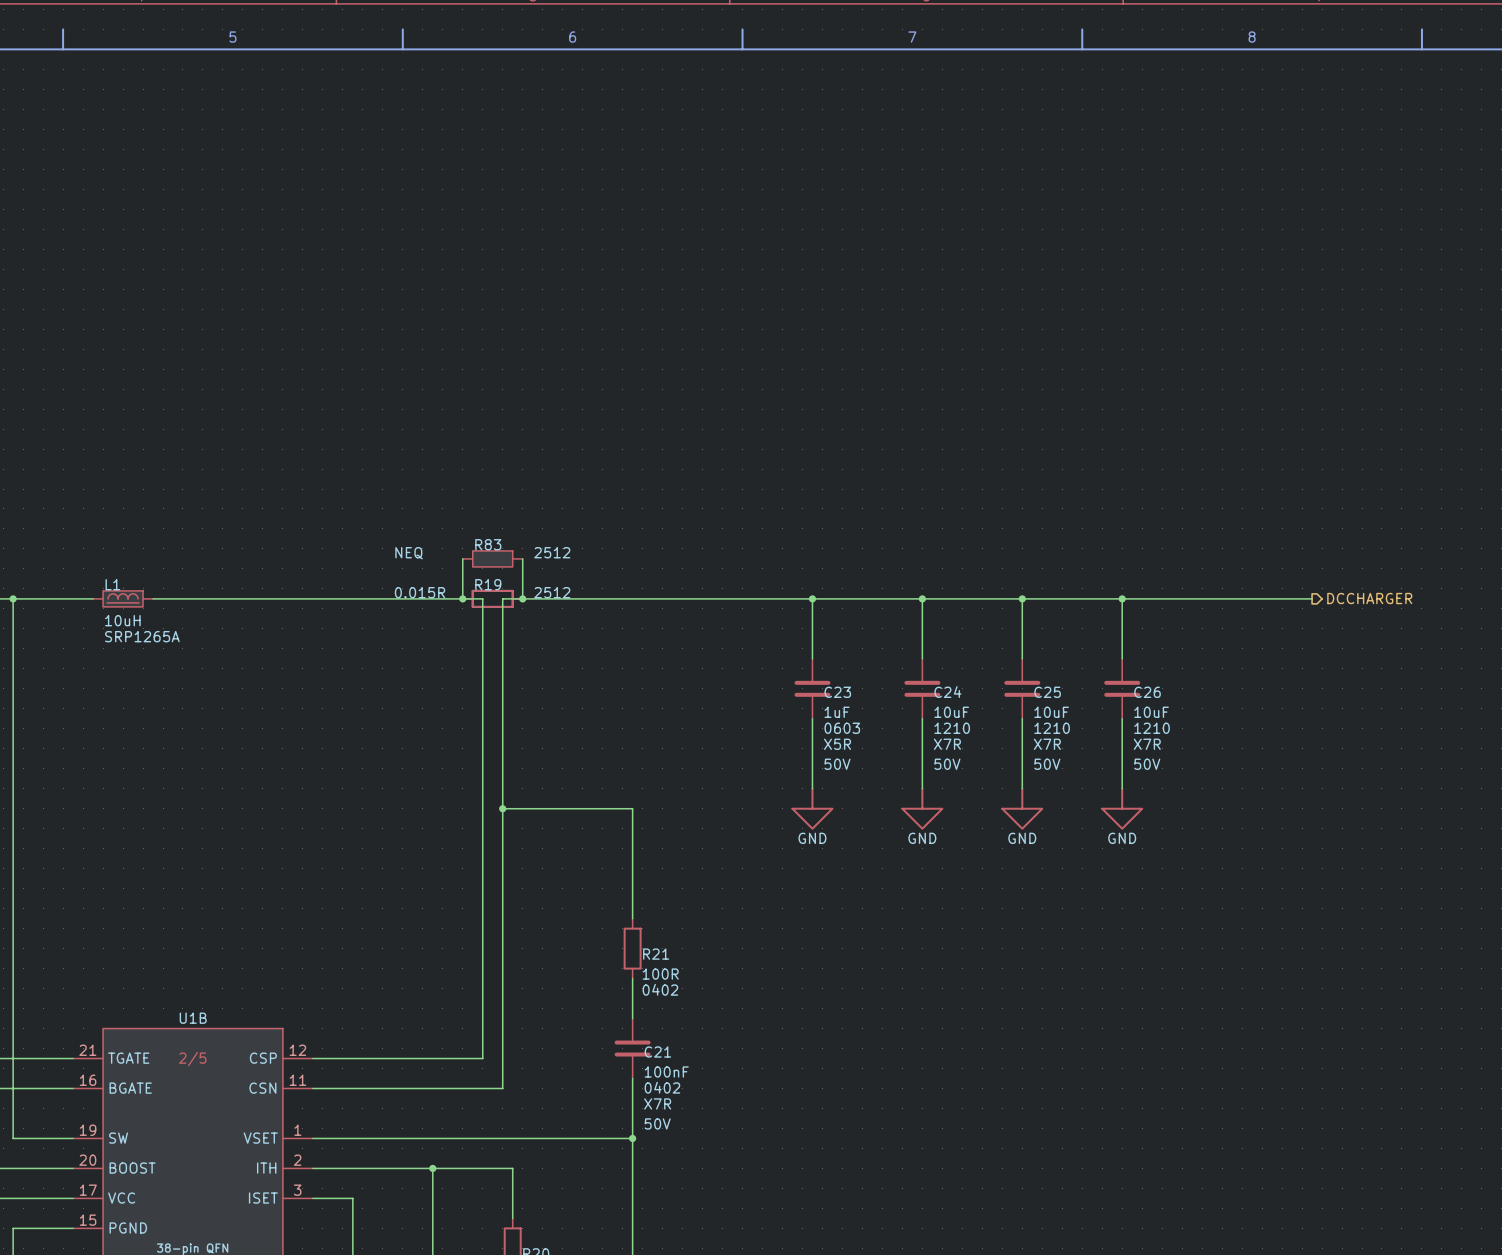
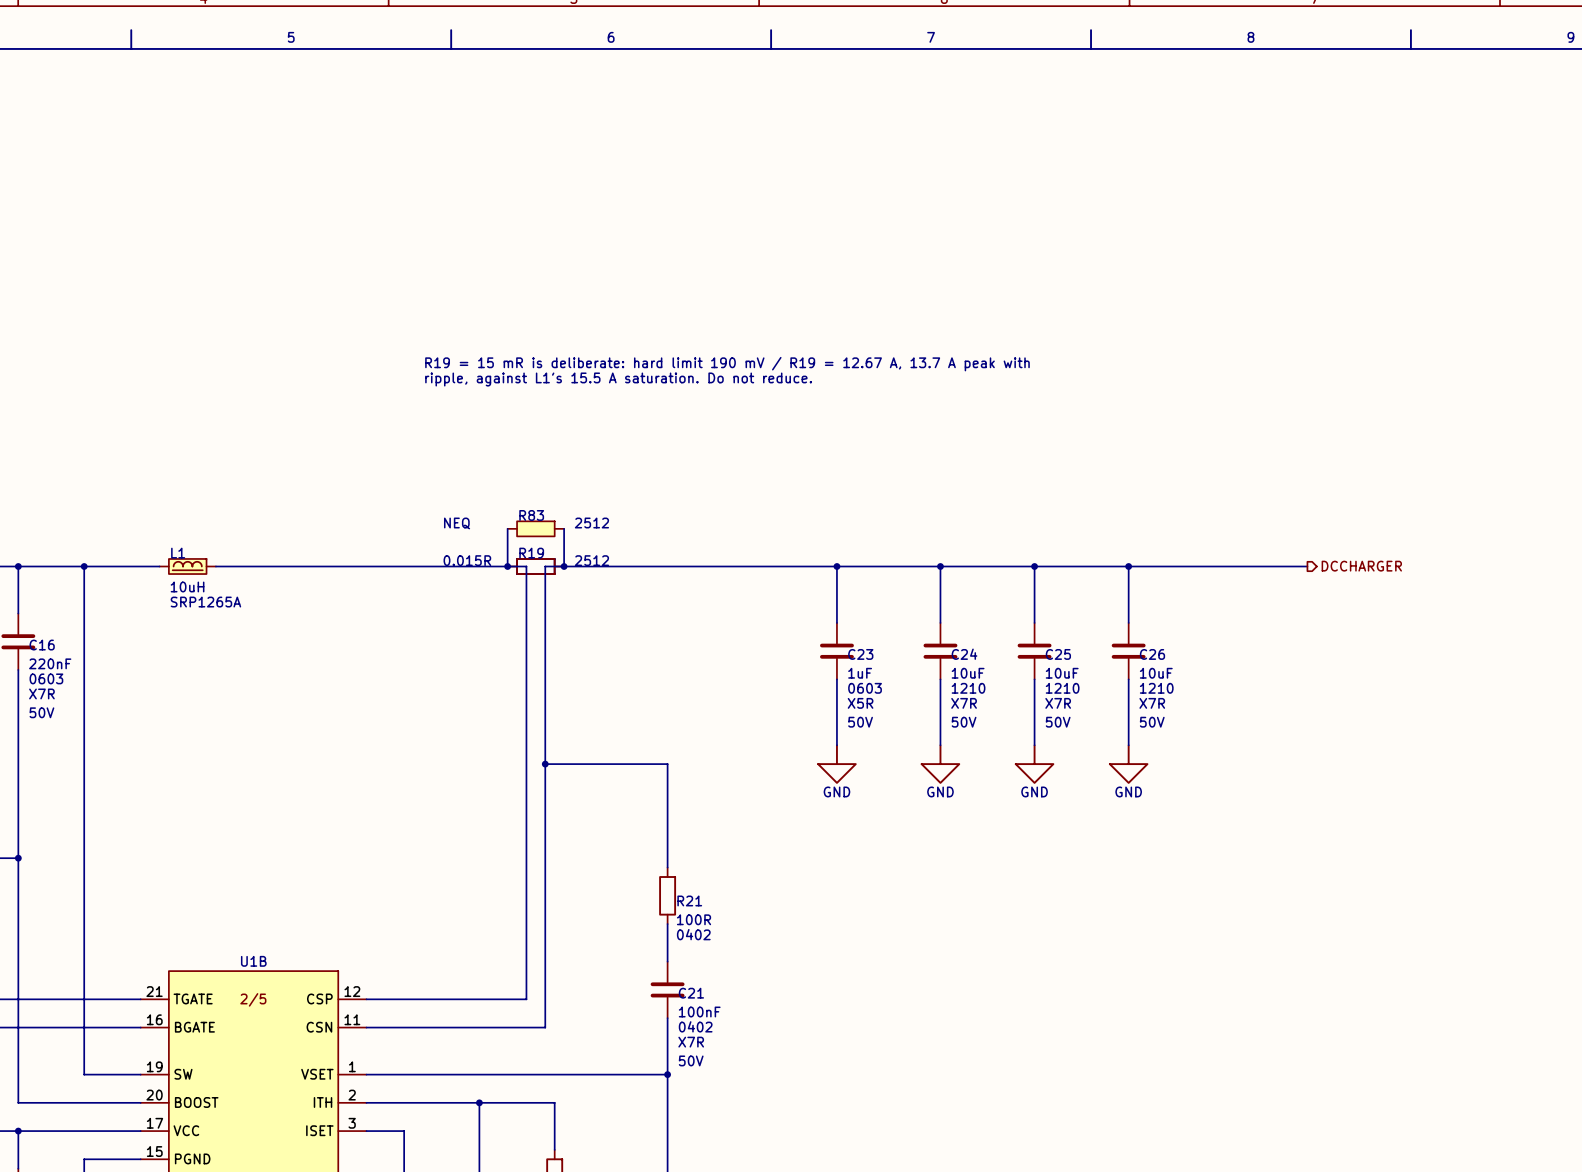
text: none -> R19 = 15 mR is deliberate: hard limit 190 mV / R19 = 12.67 A, 13.7 A peak with (727, 364)
text: none -> ripple, against L1's 15.5 A saturation. Do not reduce. (618, 379)

